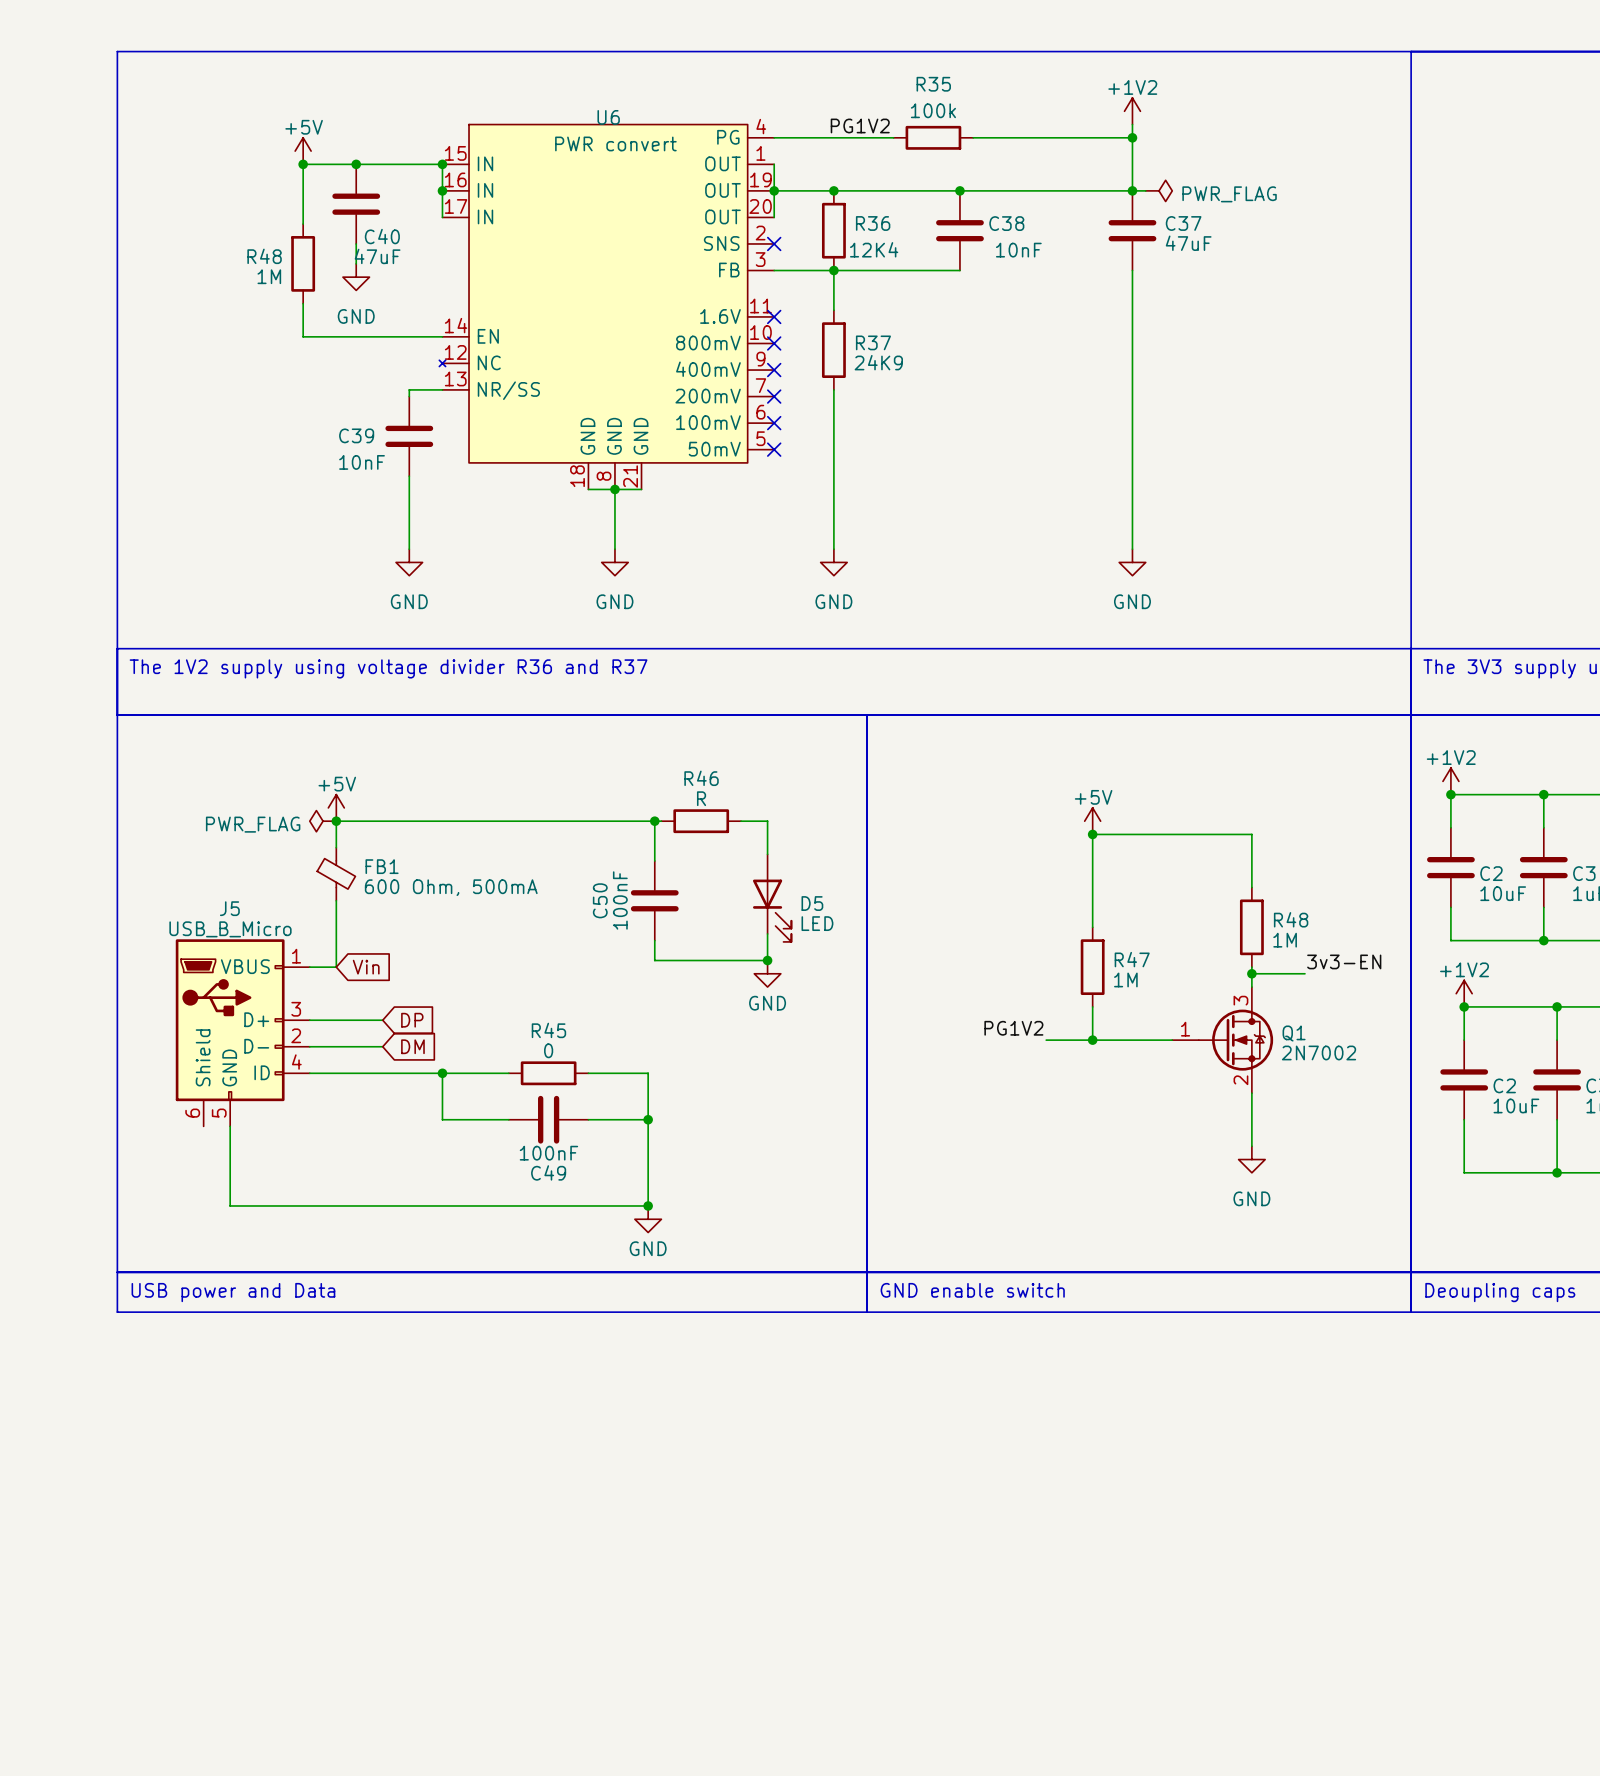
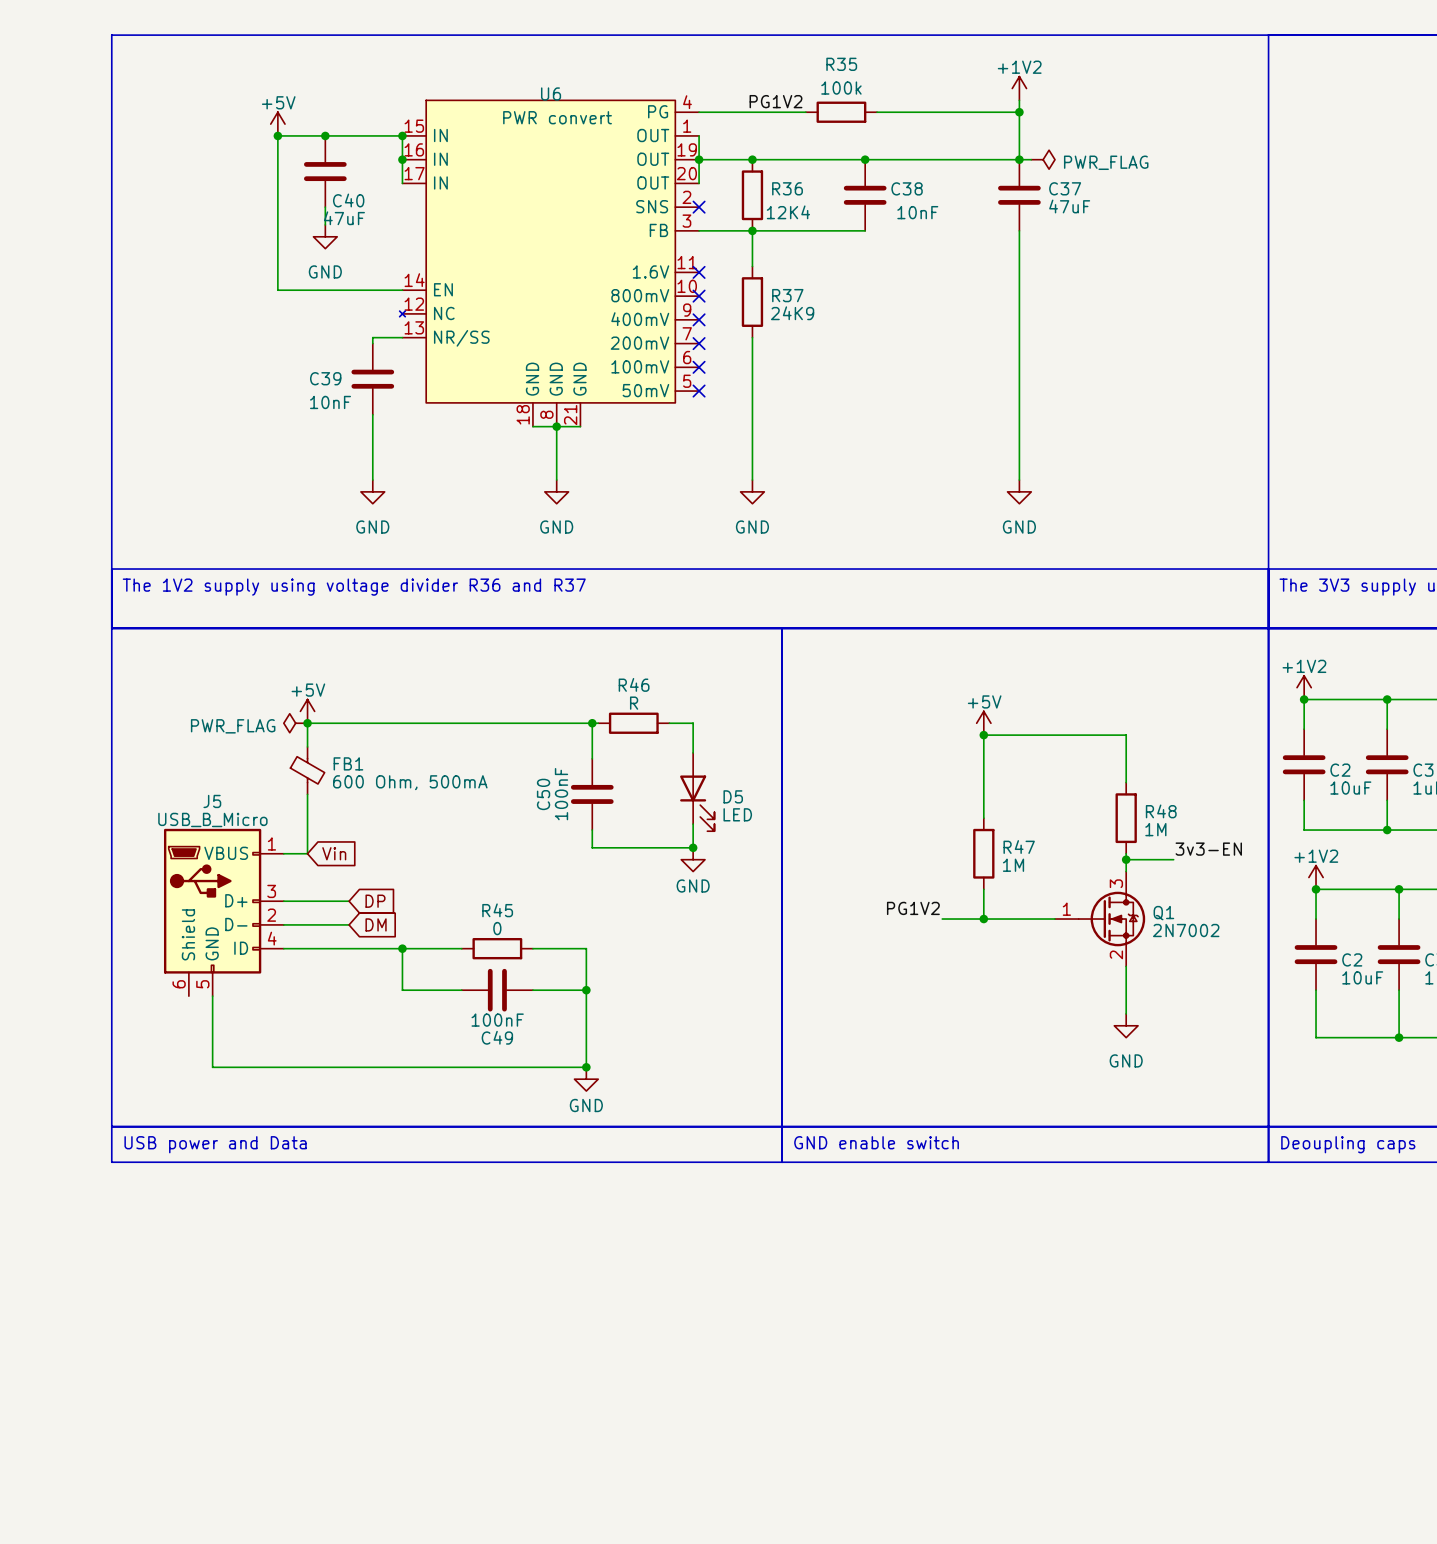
wire: none -> (277, 189) (277, 260)
R48: 1M (303, 263) -> none

